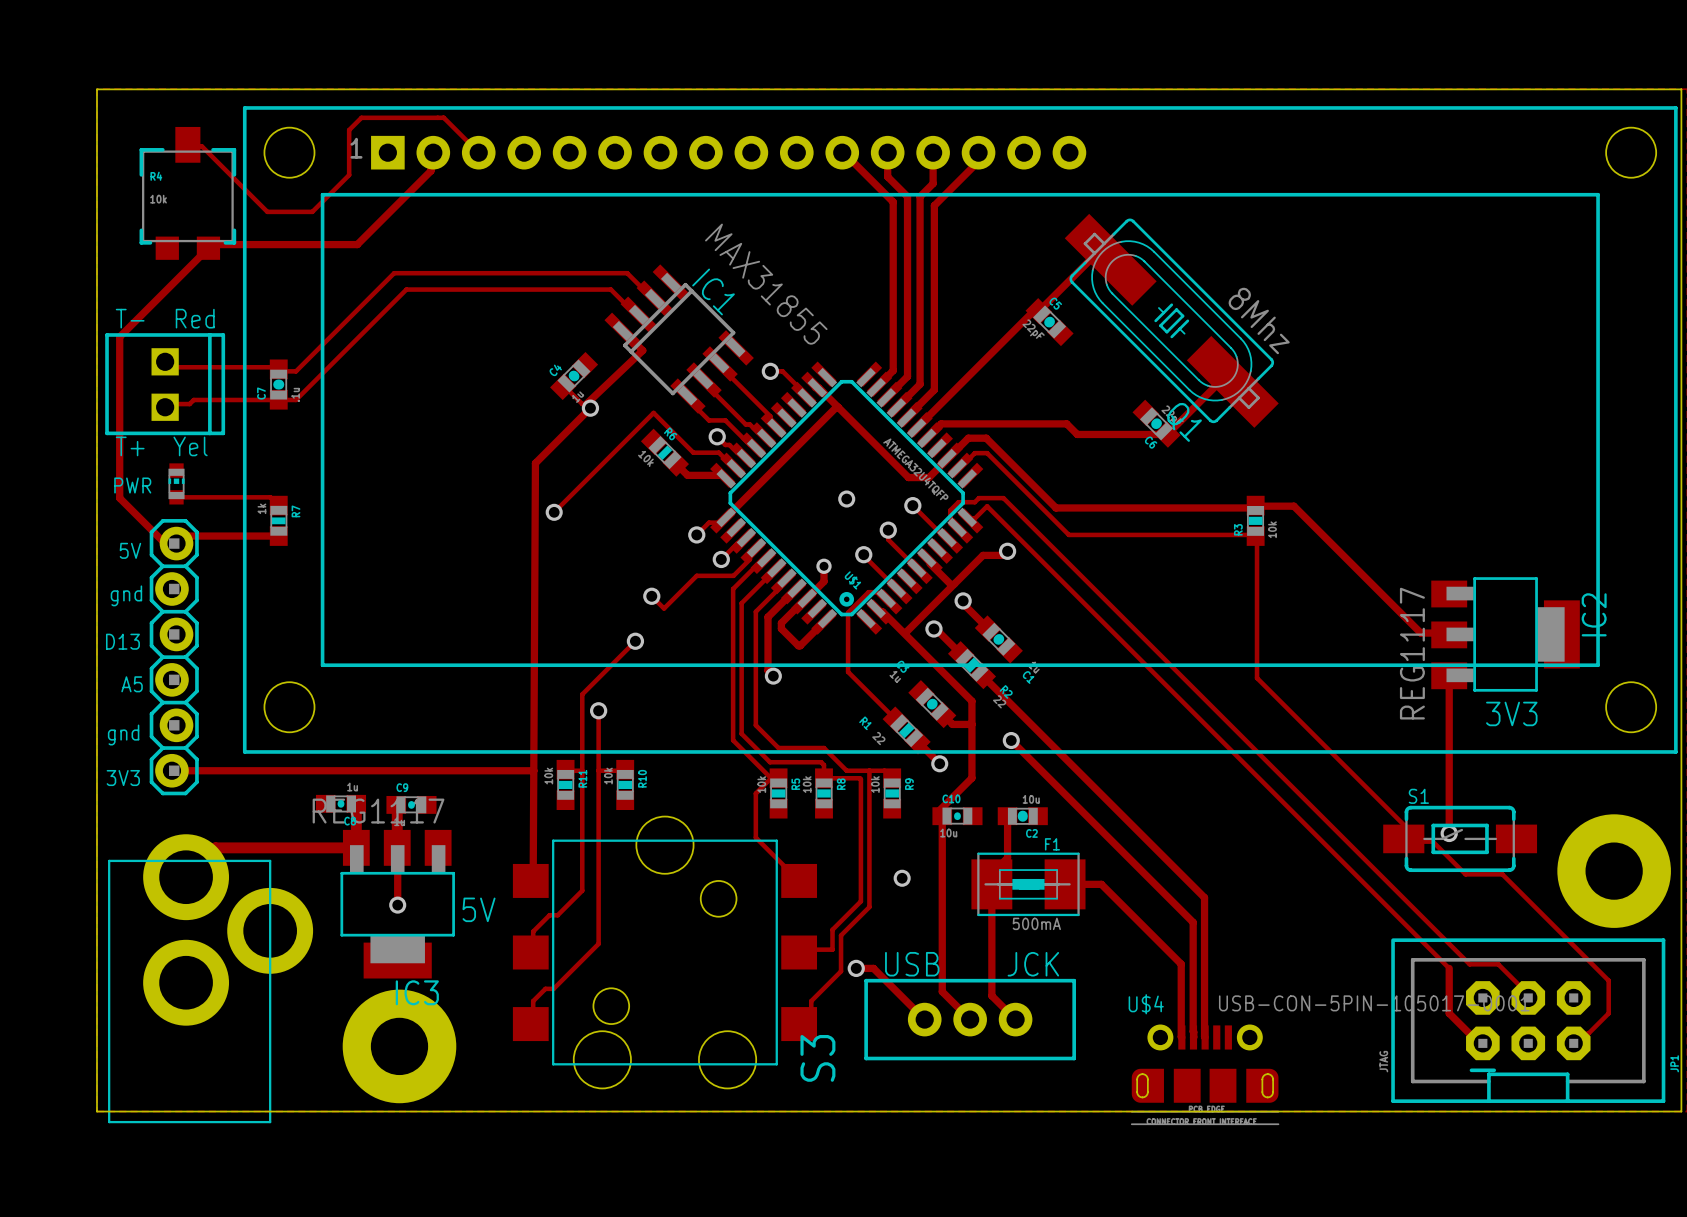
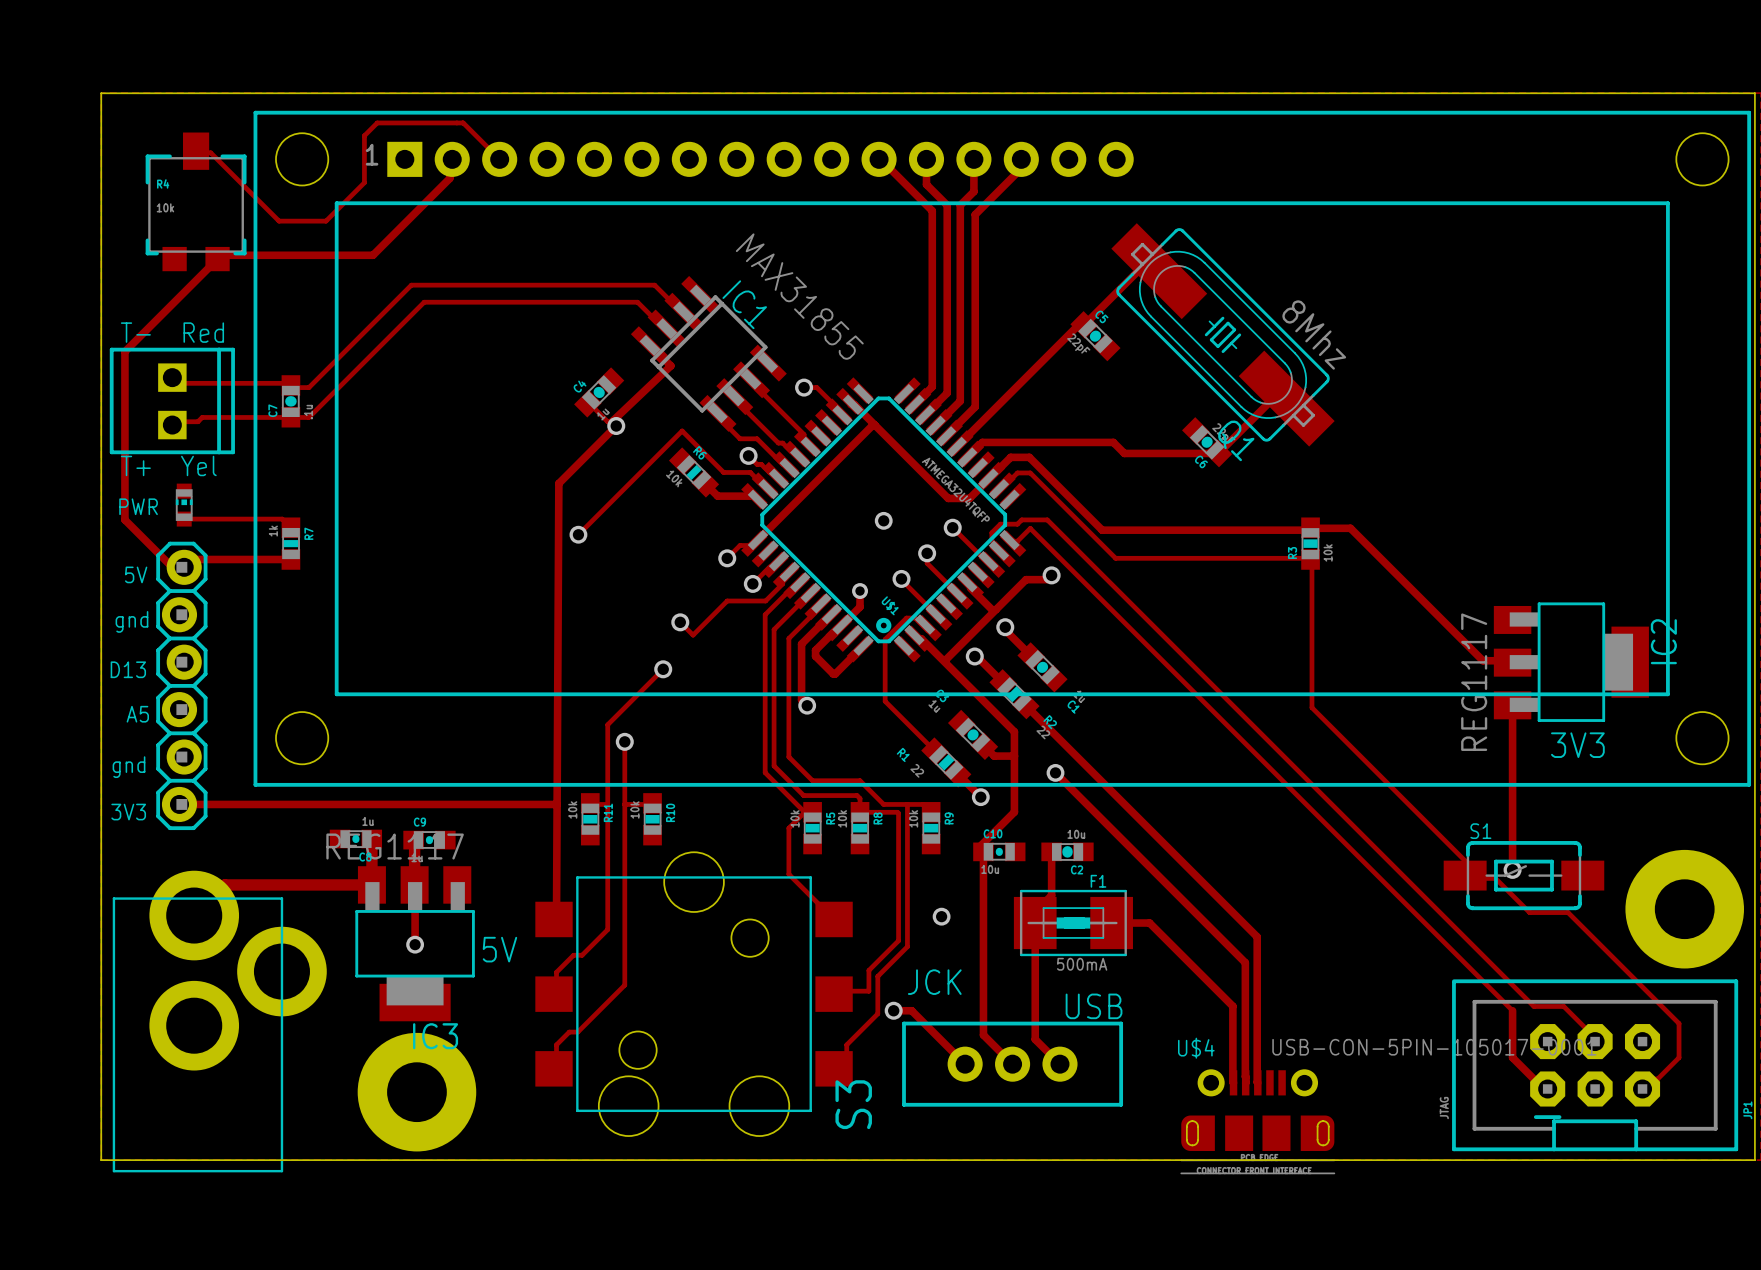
text position: USB (912, 964) -> USB (1094, 1006)
text position: JCK (1033, 964) -> JCK (934, 982)

